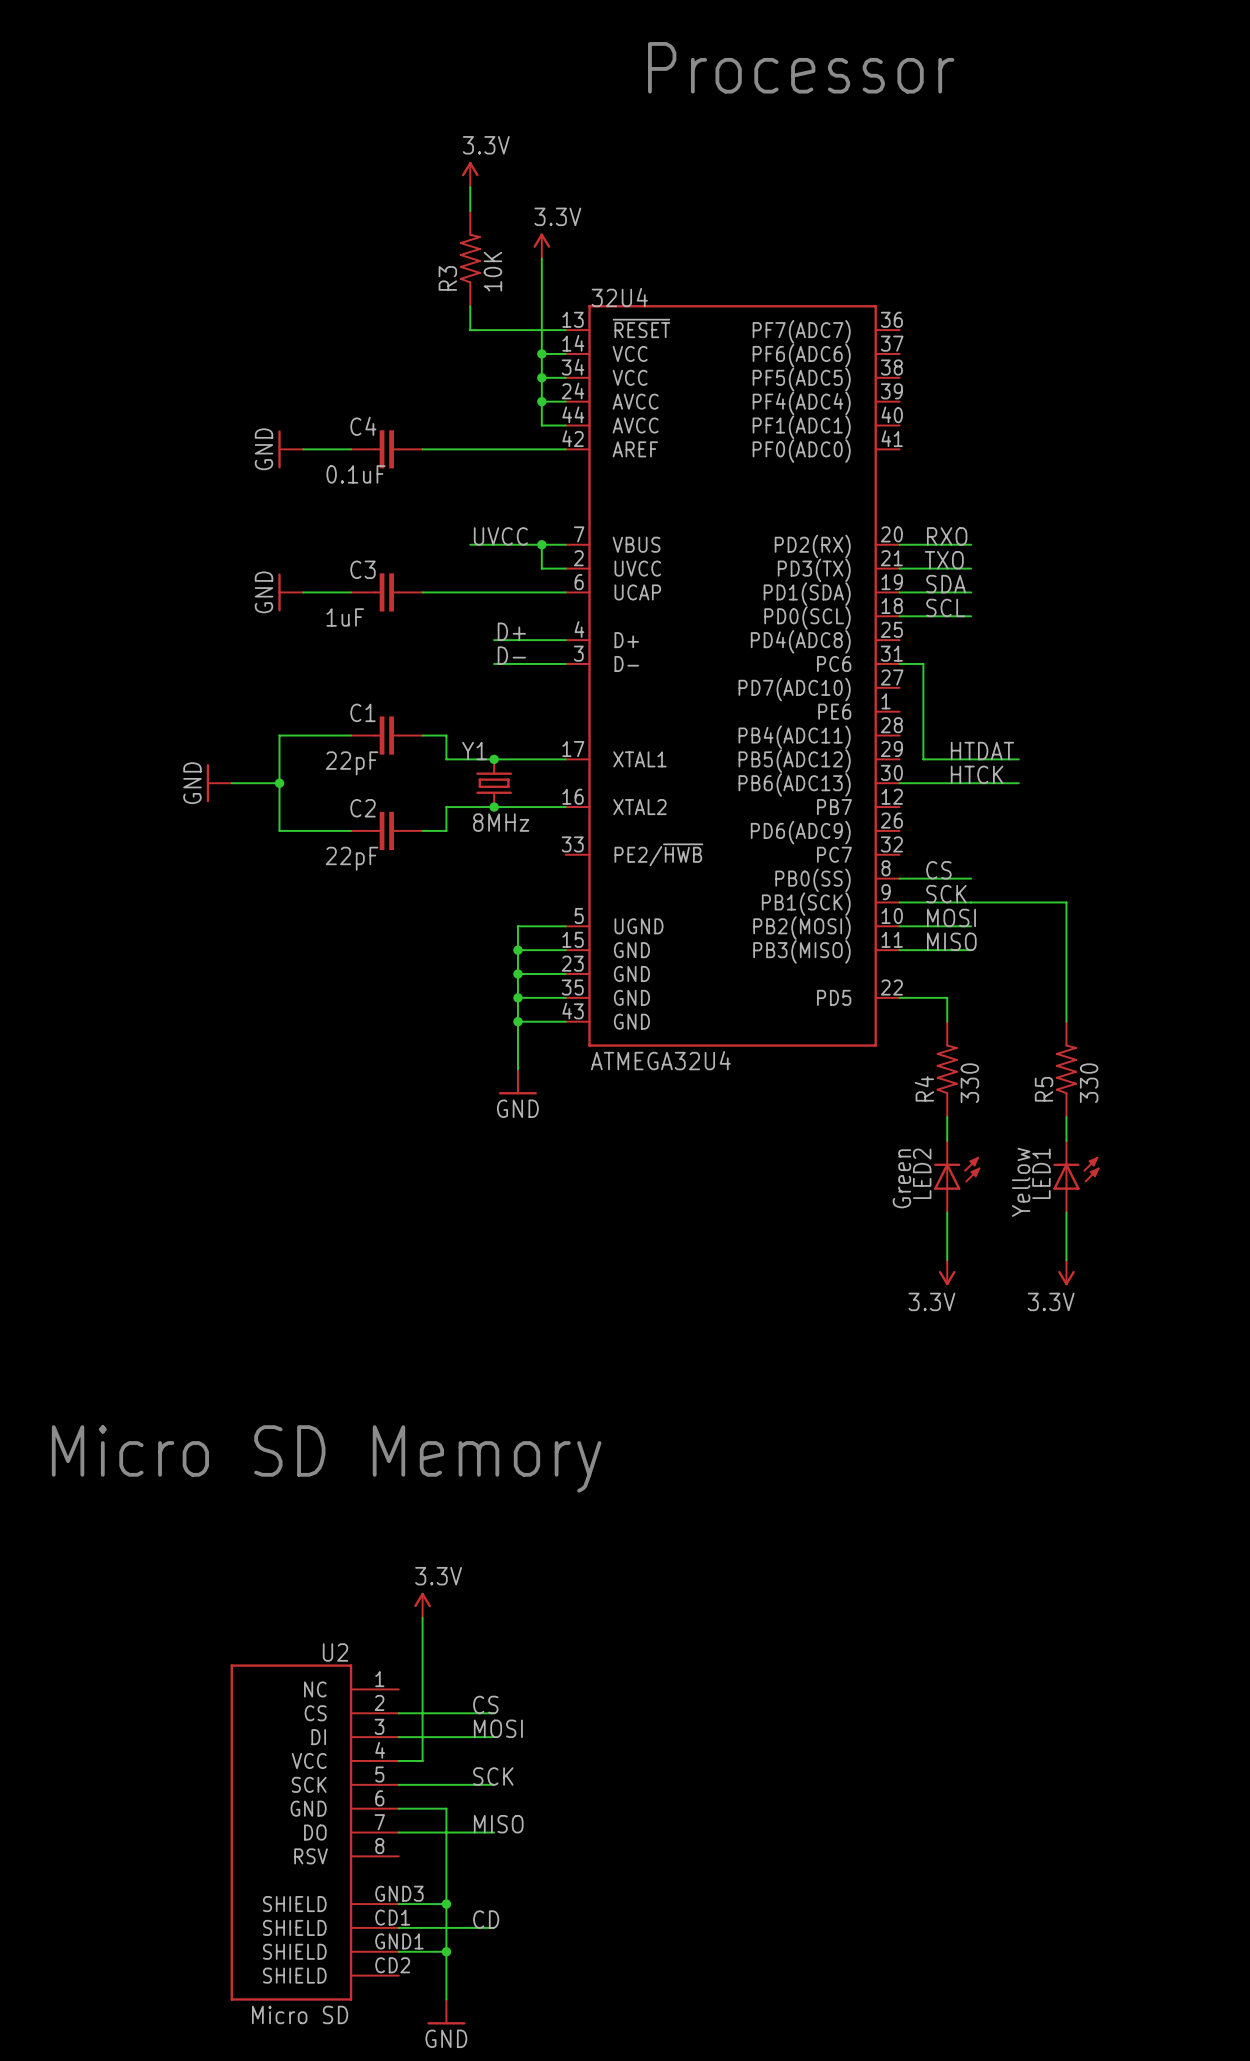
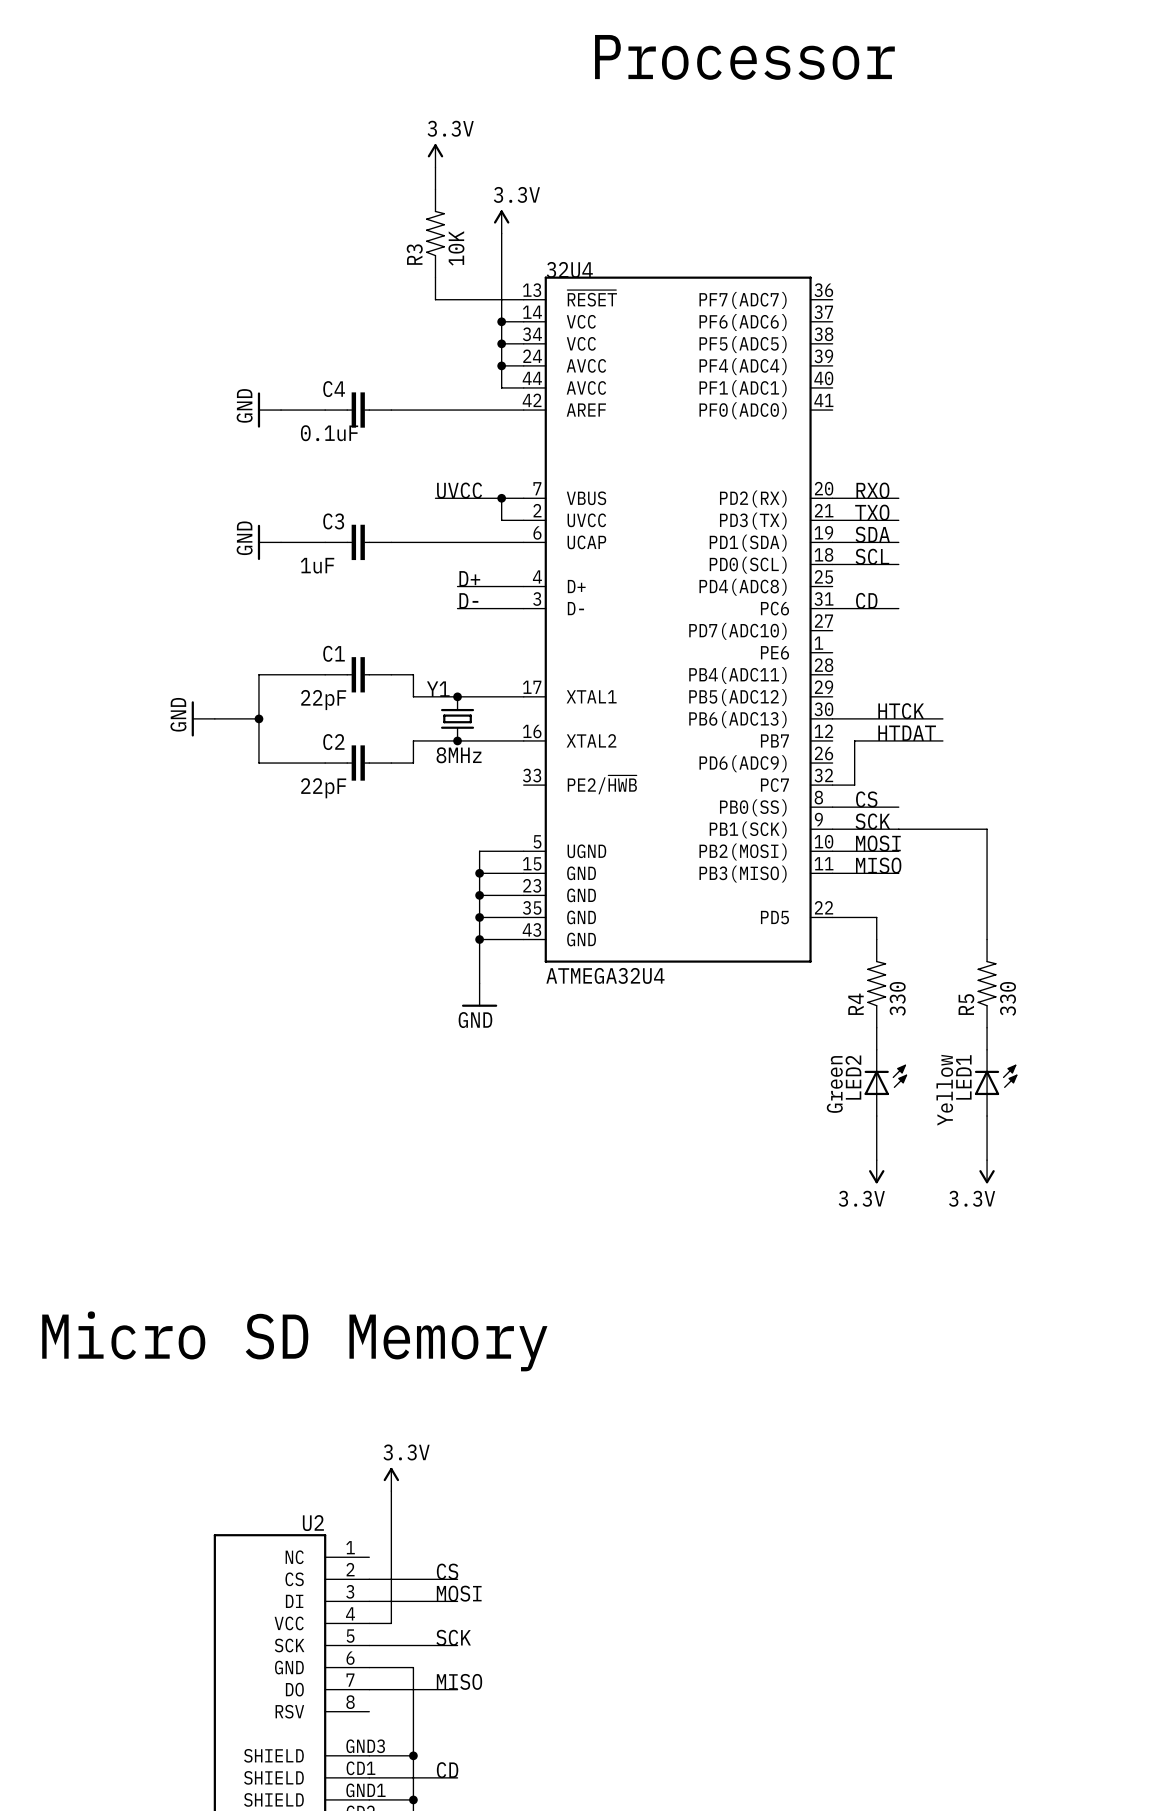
label: none -> CD (866, 600)
wire: (923, 663) (923, 759) (1018, 759) -> (854, 608) (898, 608)
label position: HTDAT (982, 751) -> HTDAT (907, 733)
wire: none -> (942, 740) (854, 740) (854, 785) (832, 785)

